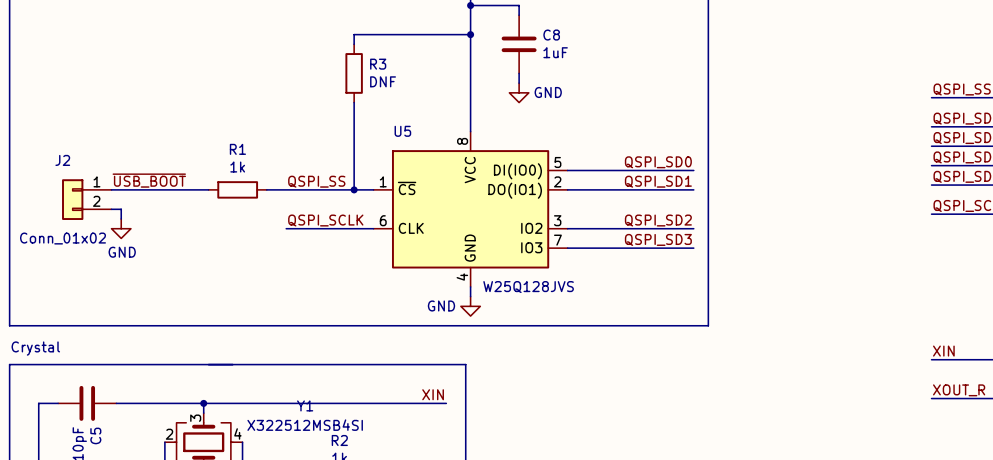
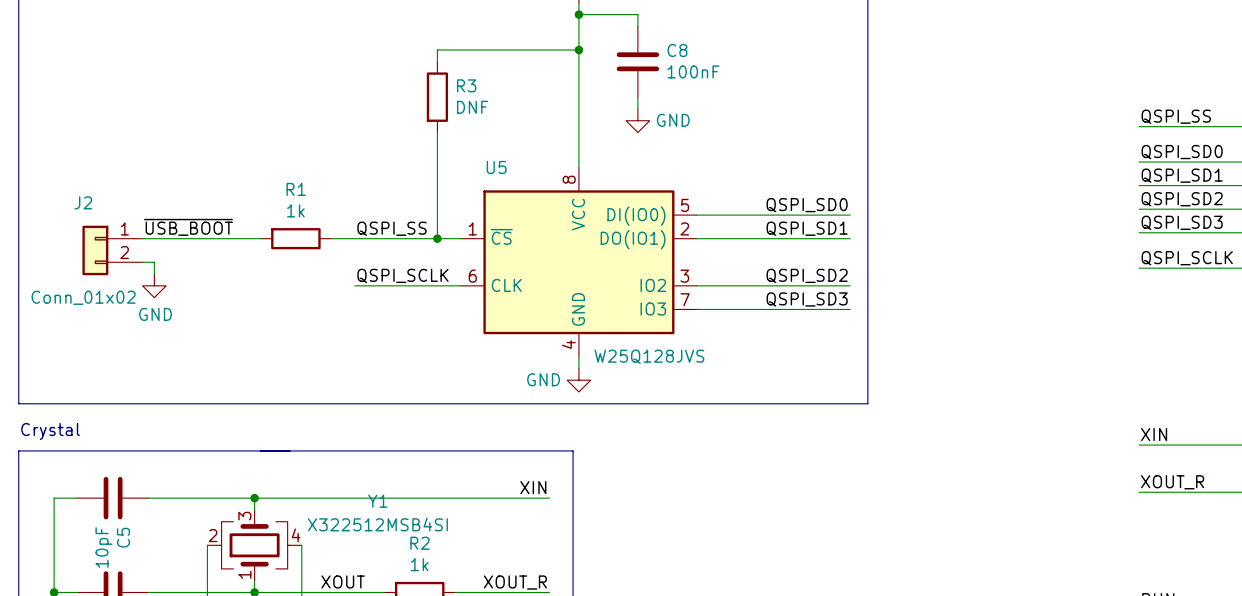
C8 value: 1uF (555, 52) -> 100nF (693, 71)

